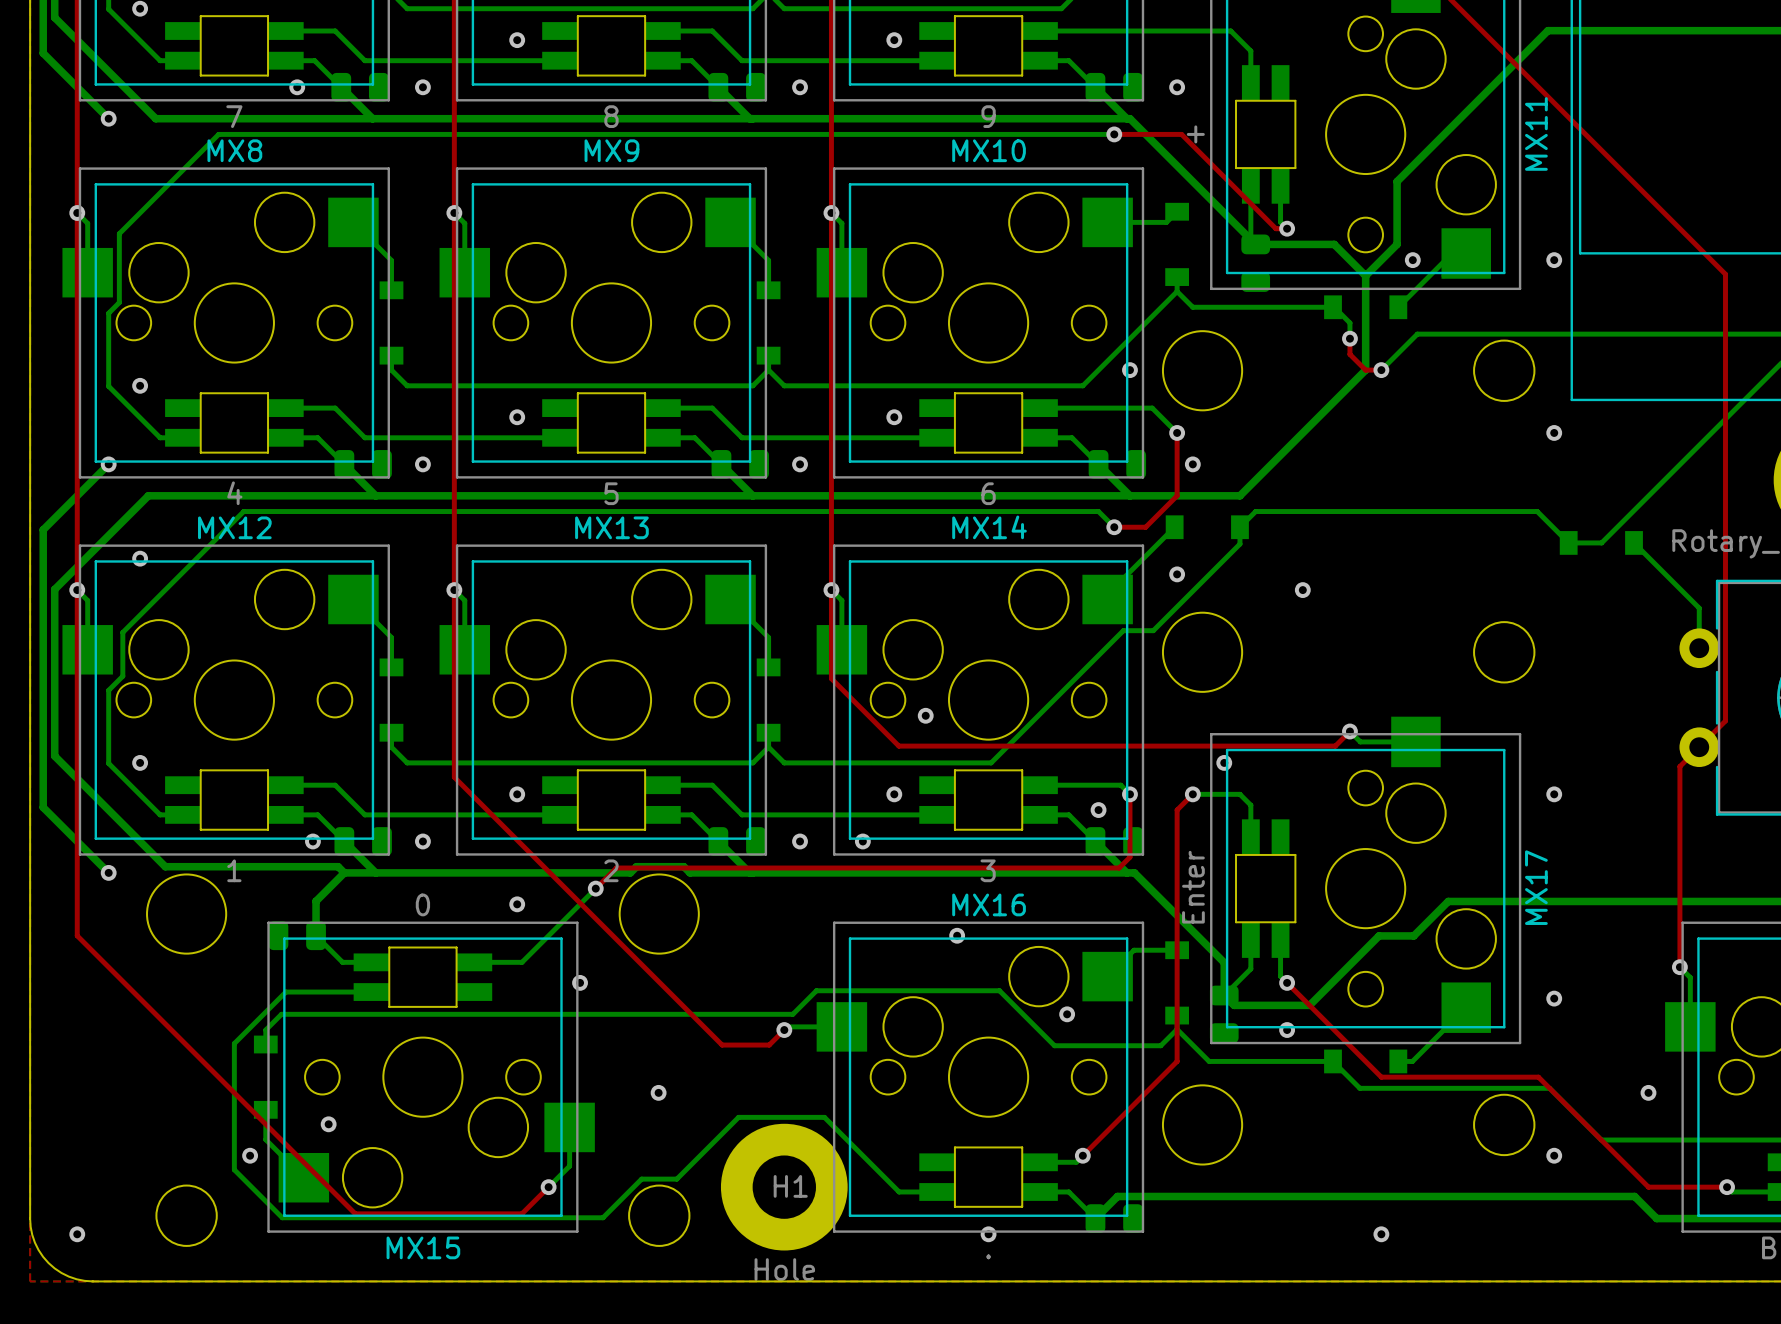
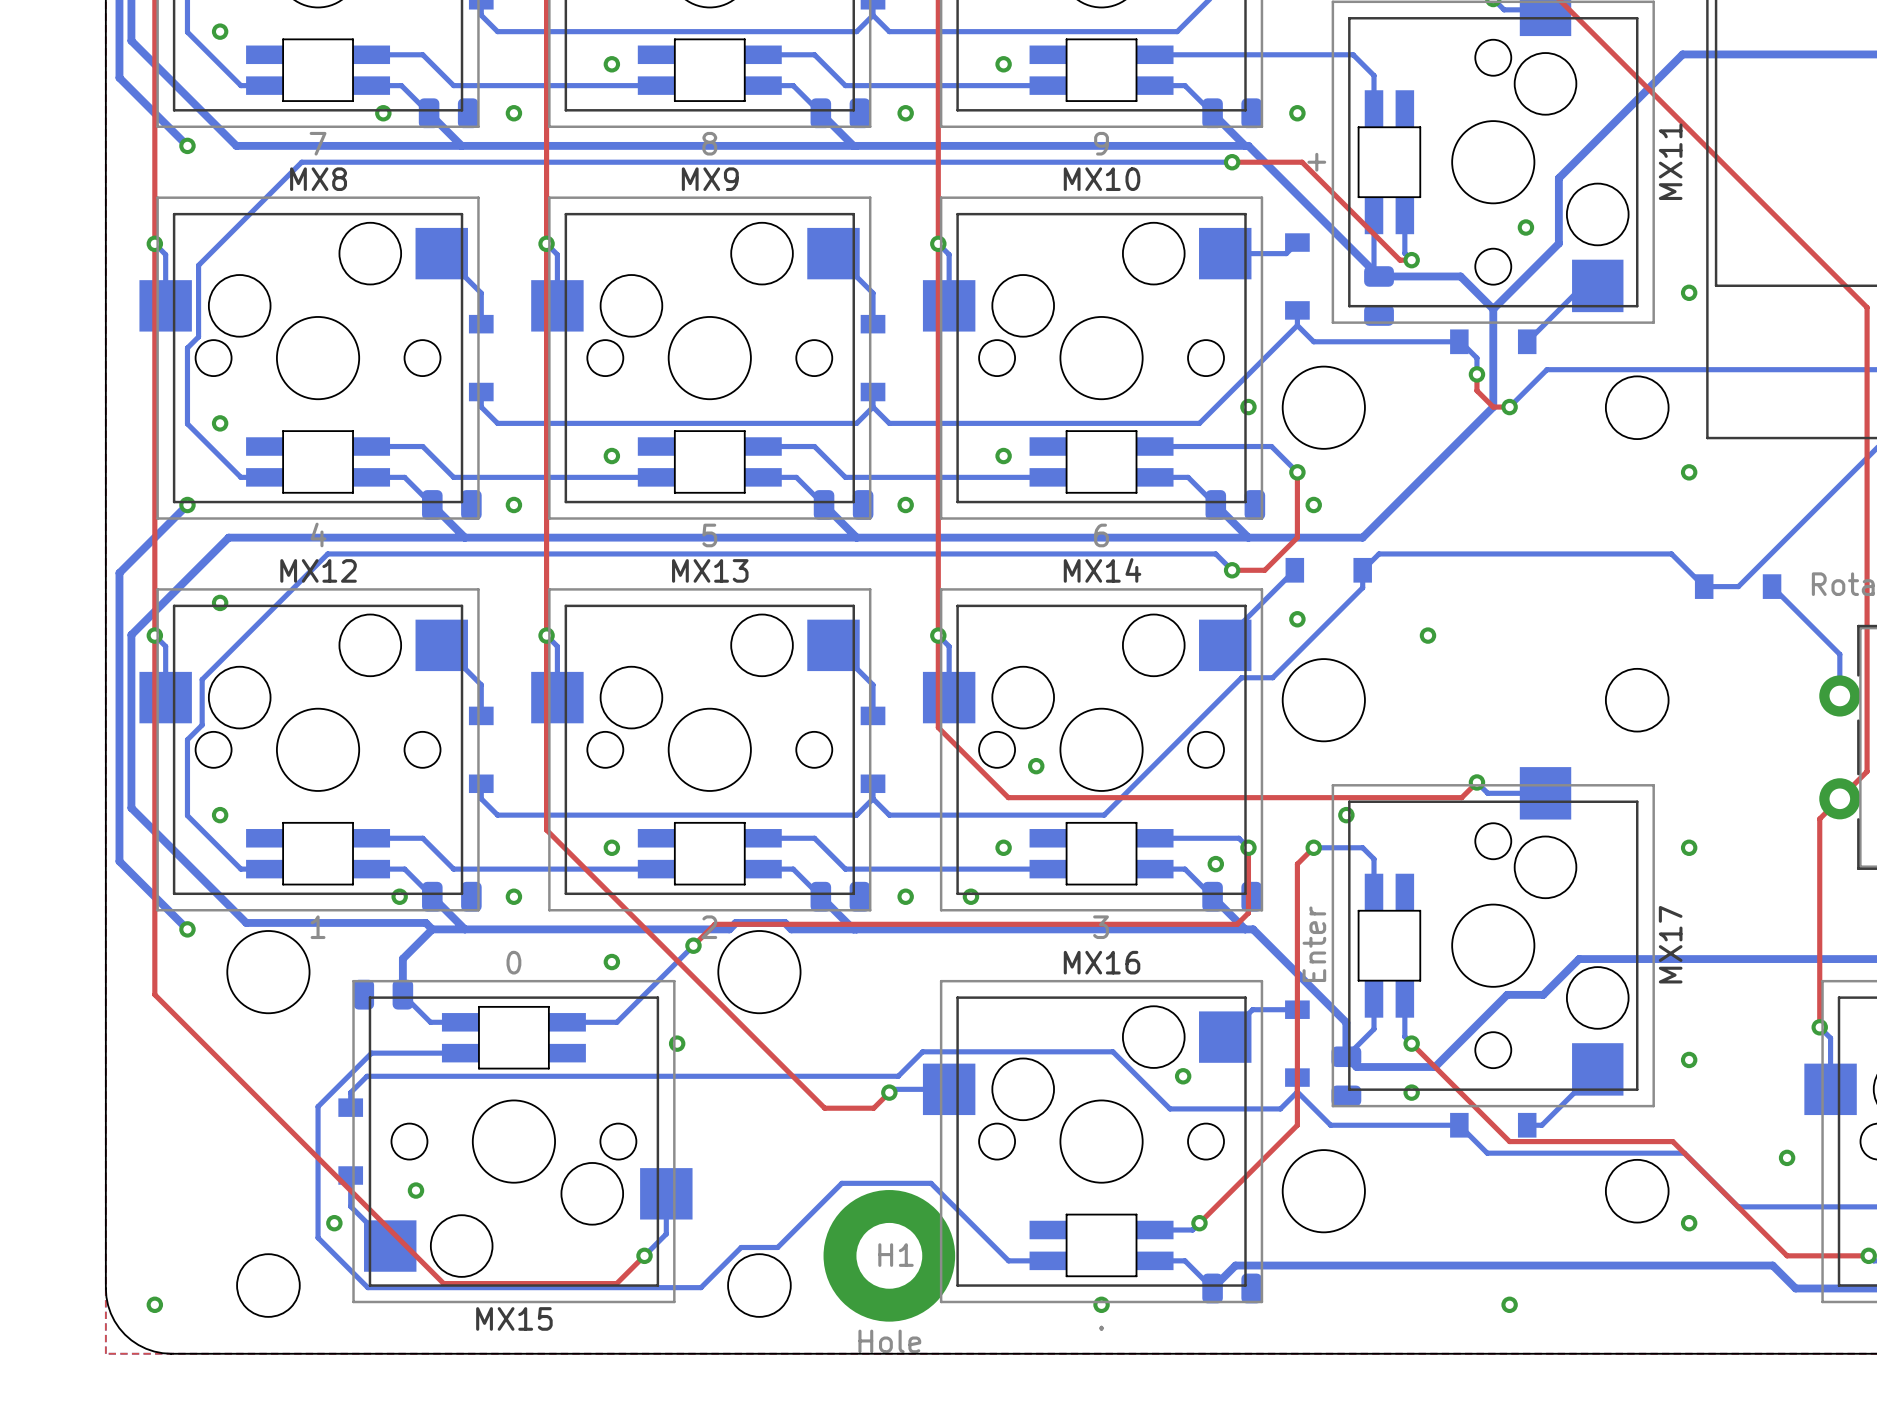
bottom track: (1428, 149) (1397, 181) (1397, 244) -> (1558, 178) (1558, 243) (1525, 276)
via position: (1412, 260) -> (1525, 227)
via: (957, 935) -> none
via: (658, 1092) -> none

